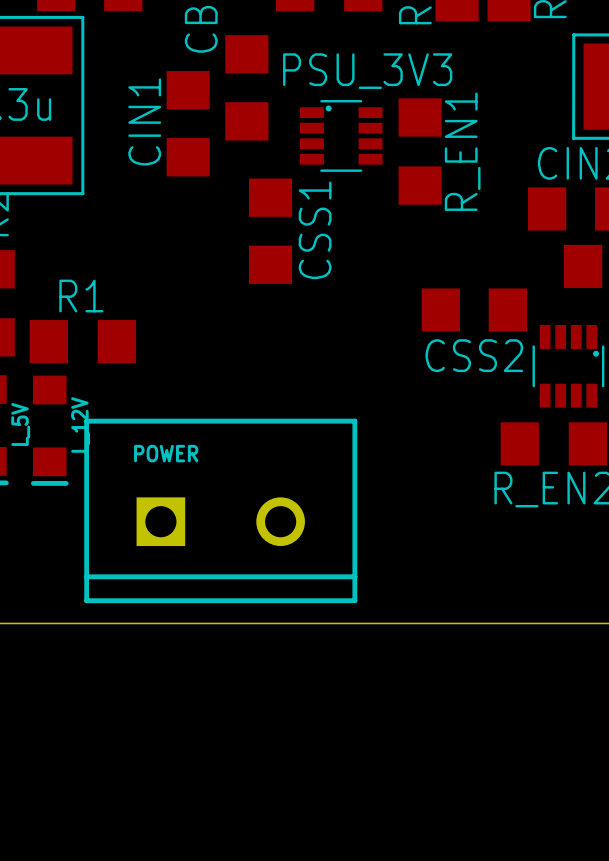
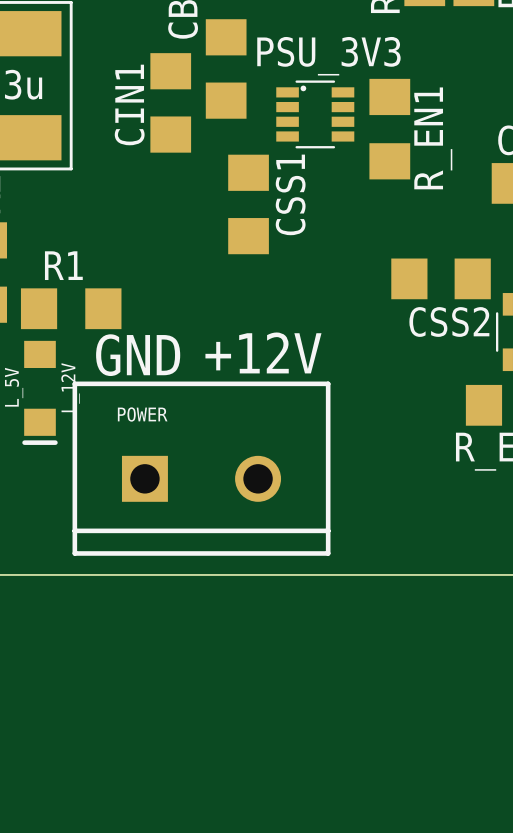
text: none -> +12V (263, 352)
text: none -> GND (138, 355)

